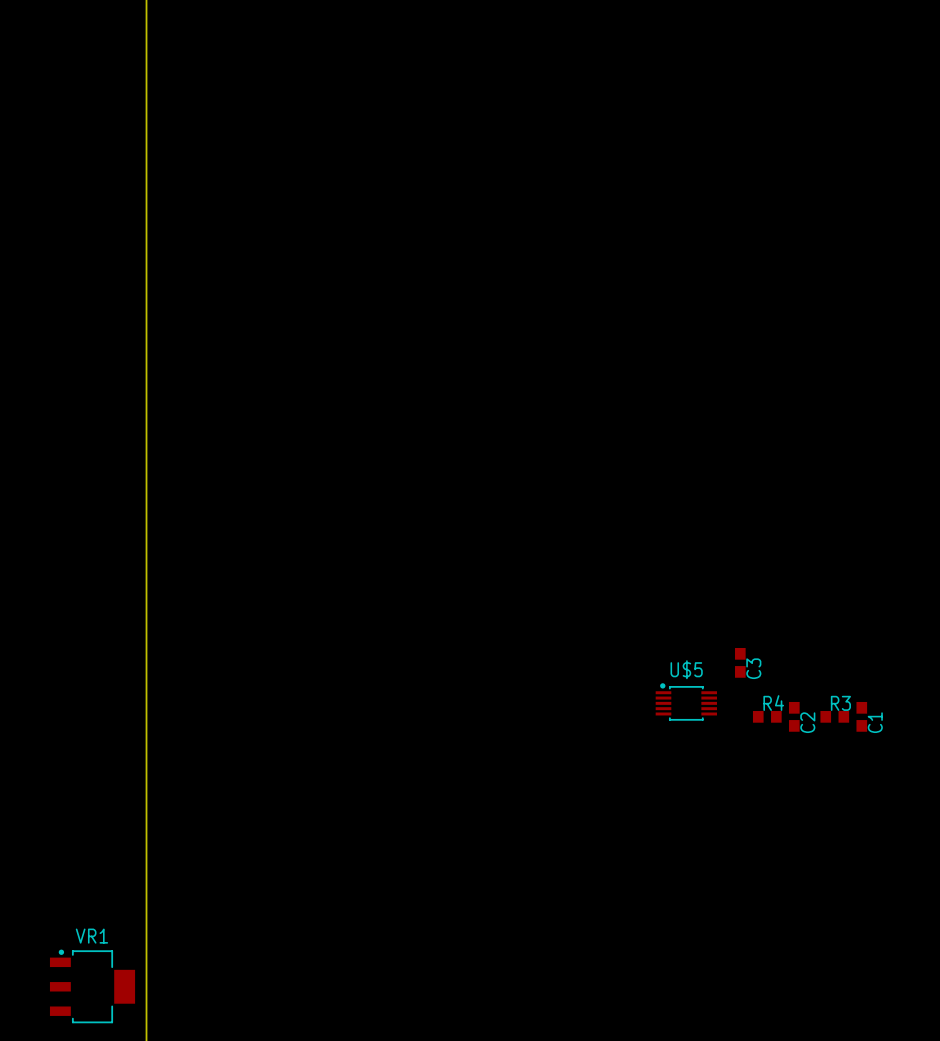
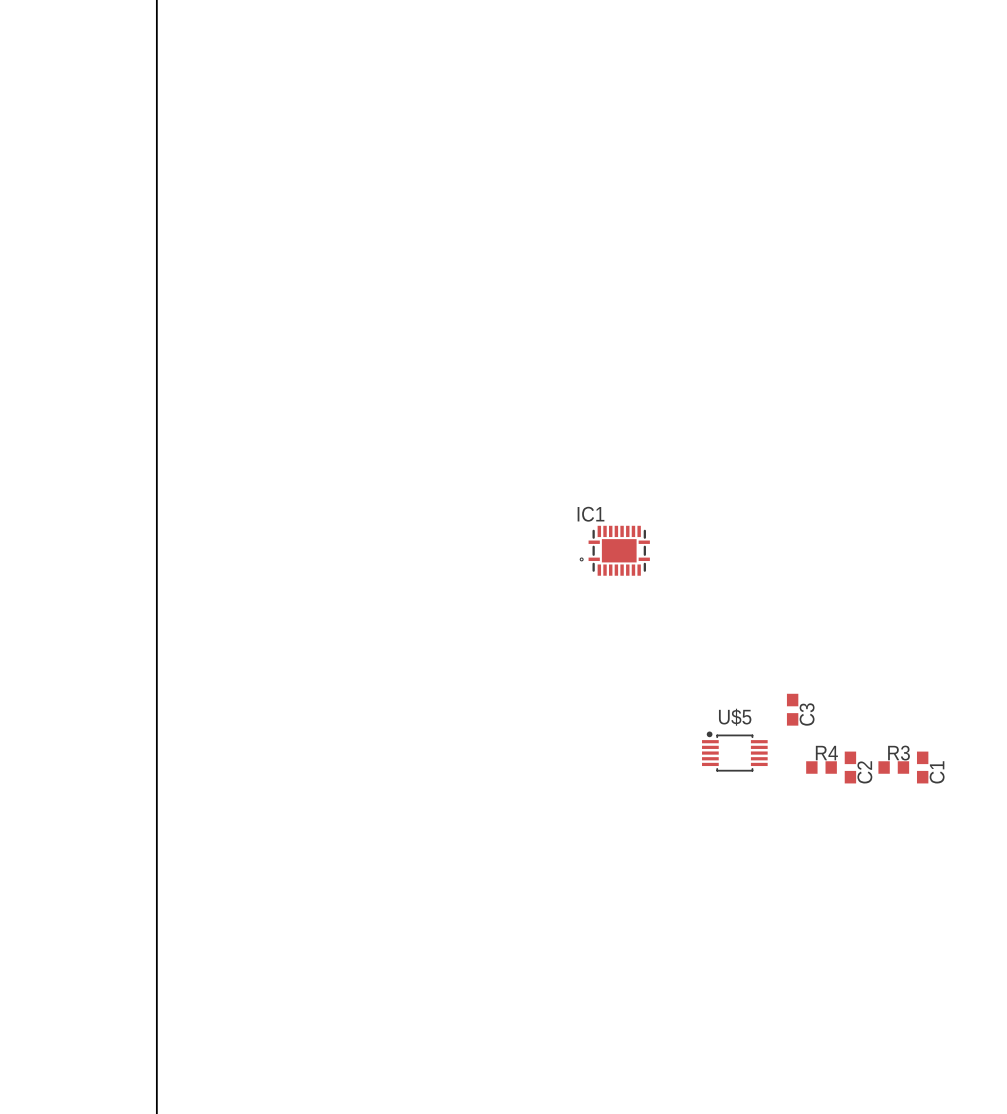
IC1: none -> (614, 550)
VR1: (92, 986) -> none

